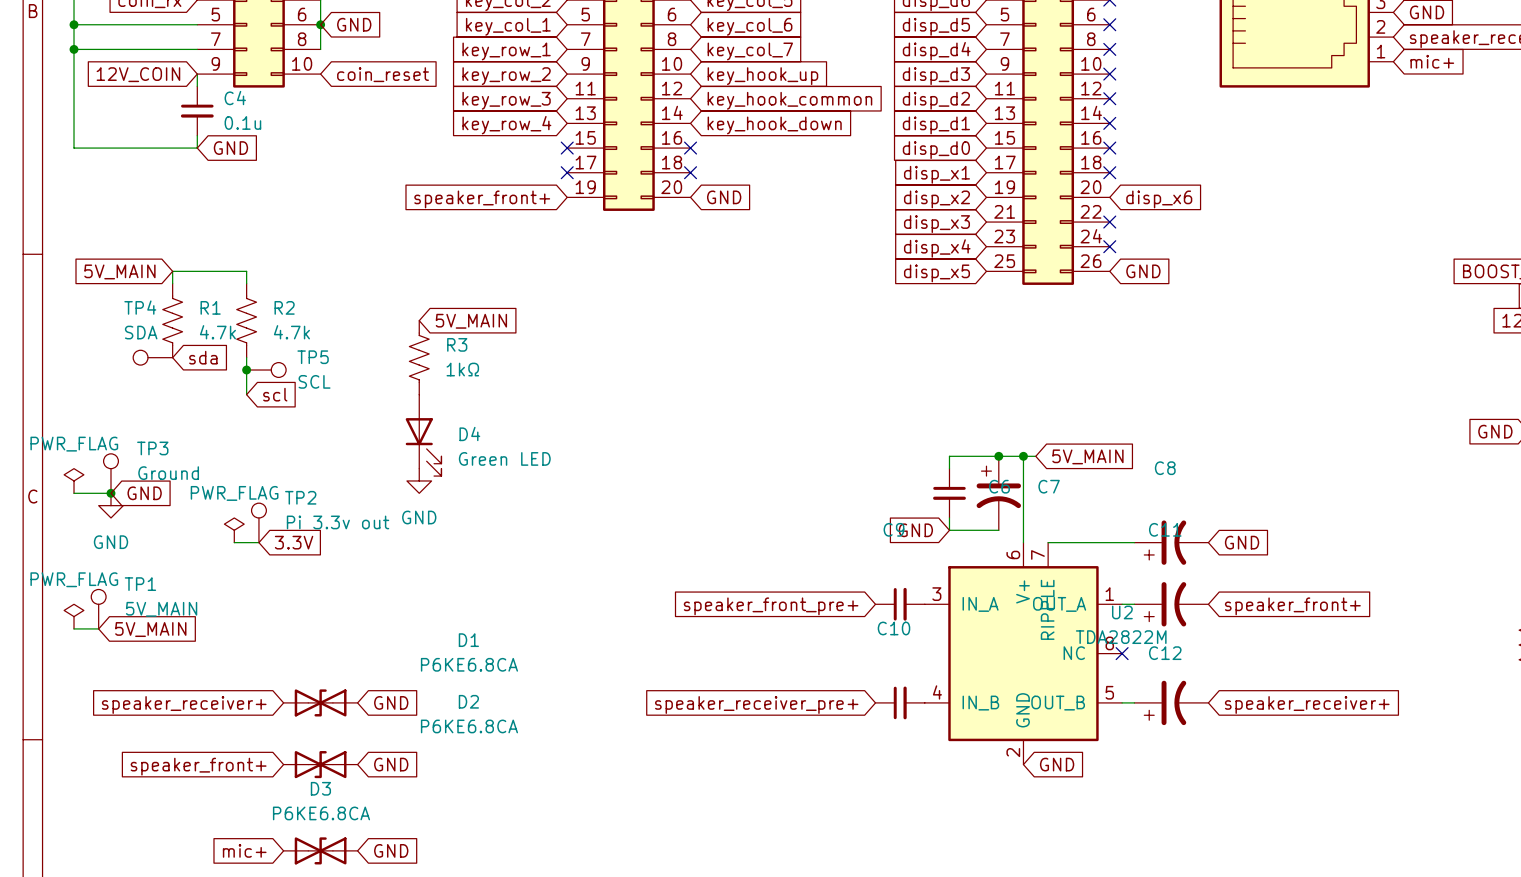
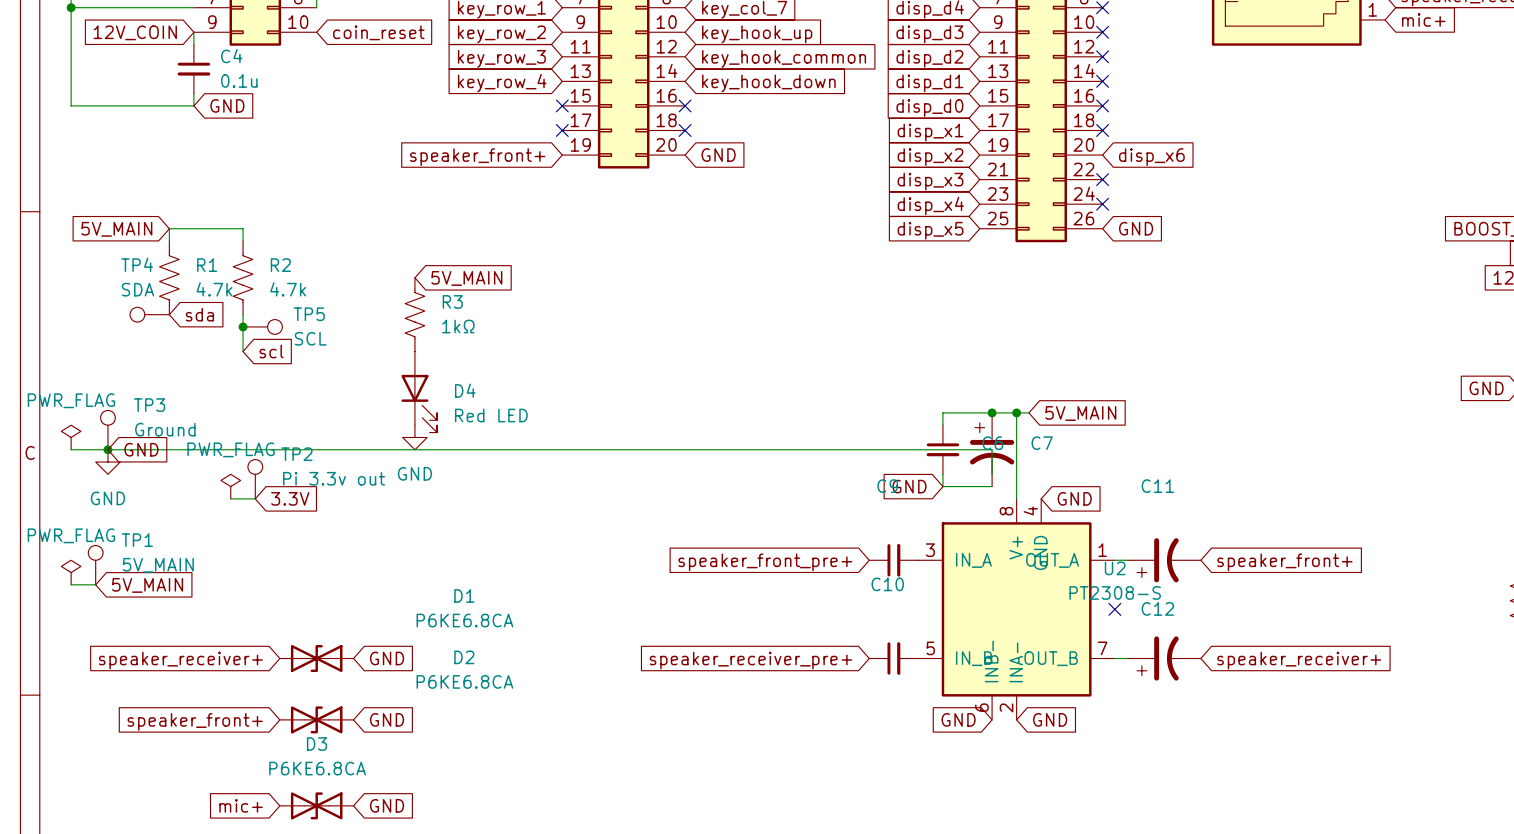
D4 value: Green LED (504, 458) -> Red LED (491, 415)
wire: none -> (107, 449) (992, 449) (992, 474)
U2 symbol: [924, 542, 1123, 765] -> [918, 498, 1115, 720]
wire: (1048, 542) (1134, 542) -> none
global label: none -> GND (1074, 498)
C8: (1171, 542) -> none
global label: GND (1242, 542) -> none
U2 value: TDA2822M (1121, 637) -> PT2308-S (1115, 592)
global label: none -> GND (958, 719)

